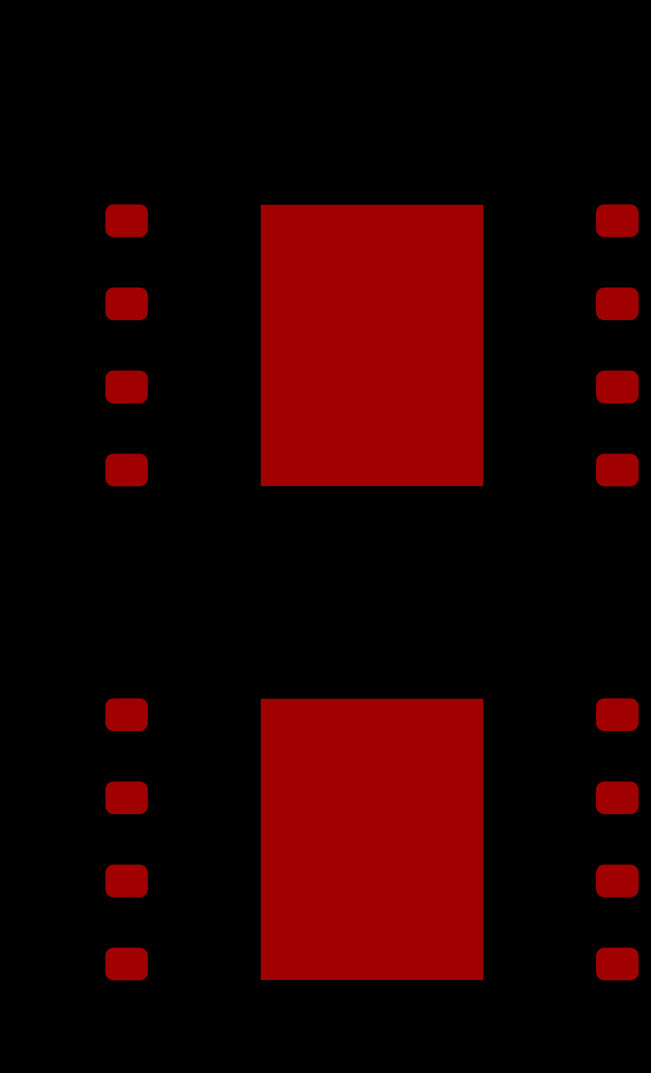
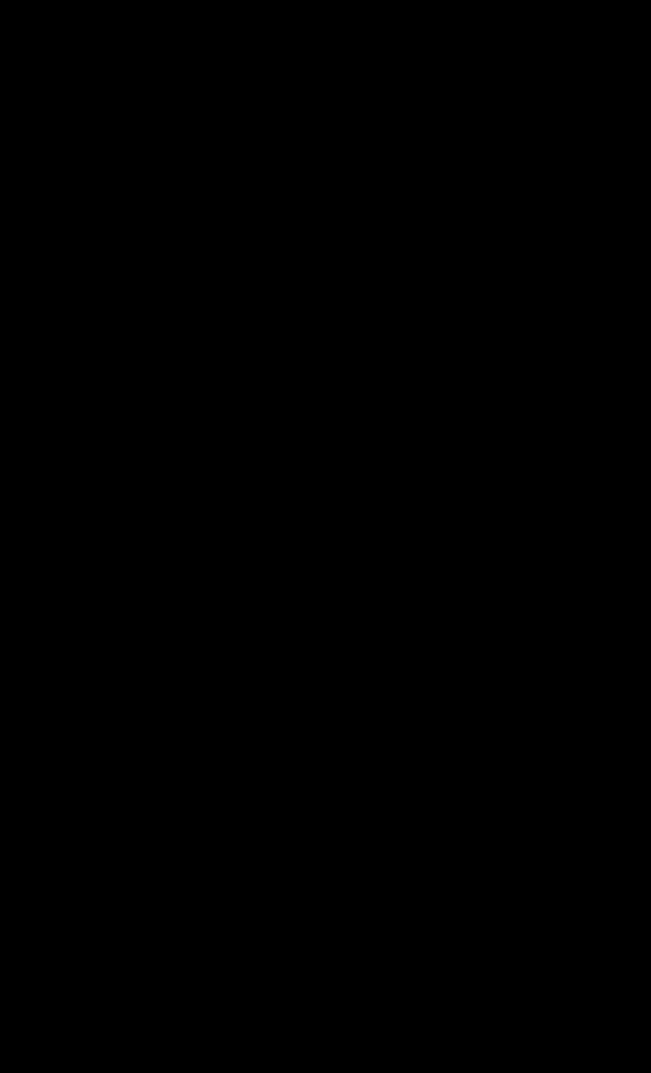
part: (371, 345) -> none
part: (371, 839) -> none

